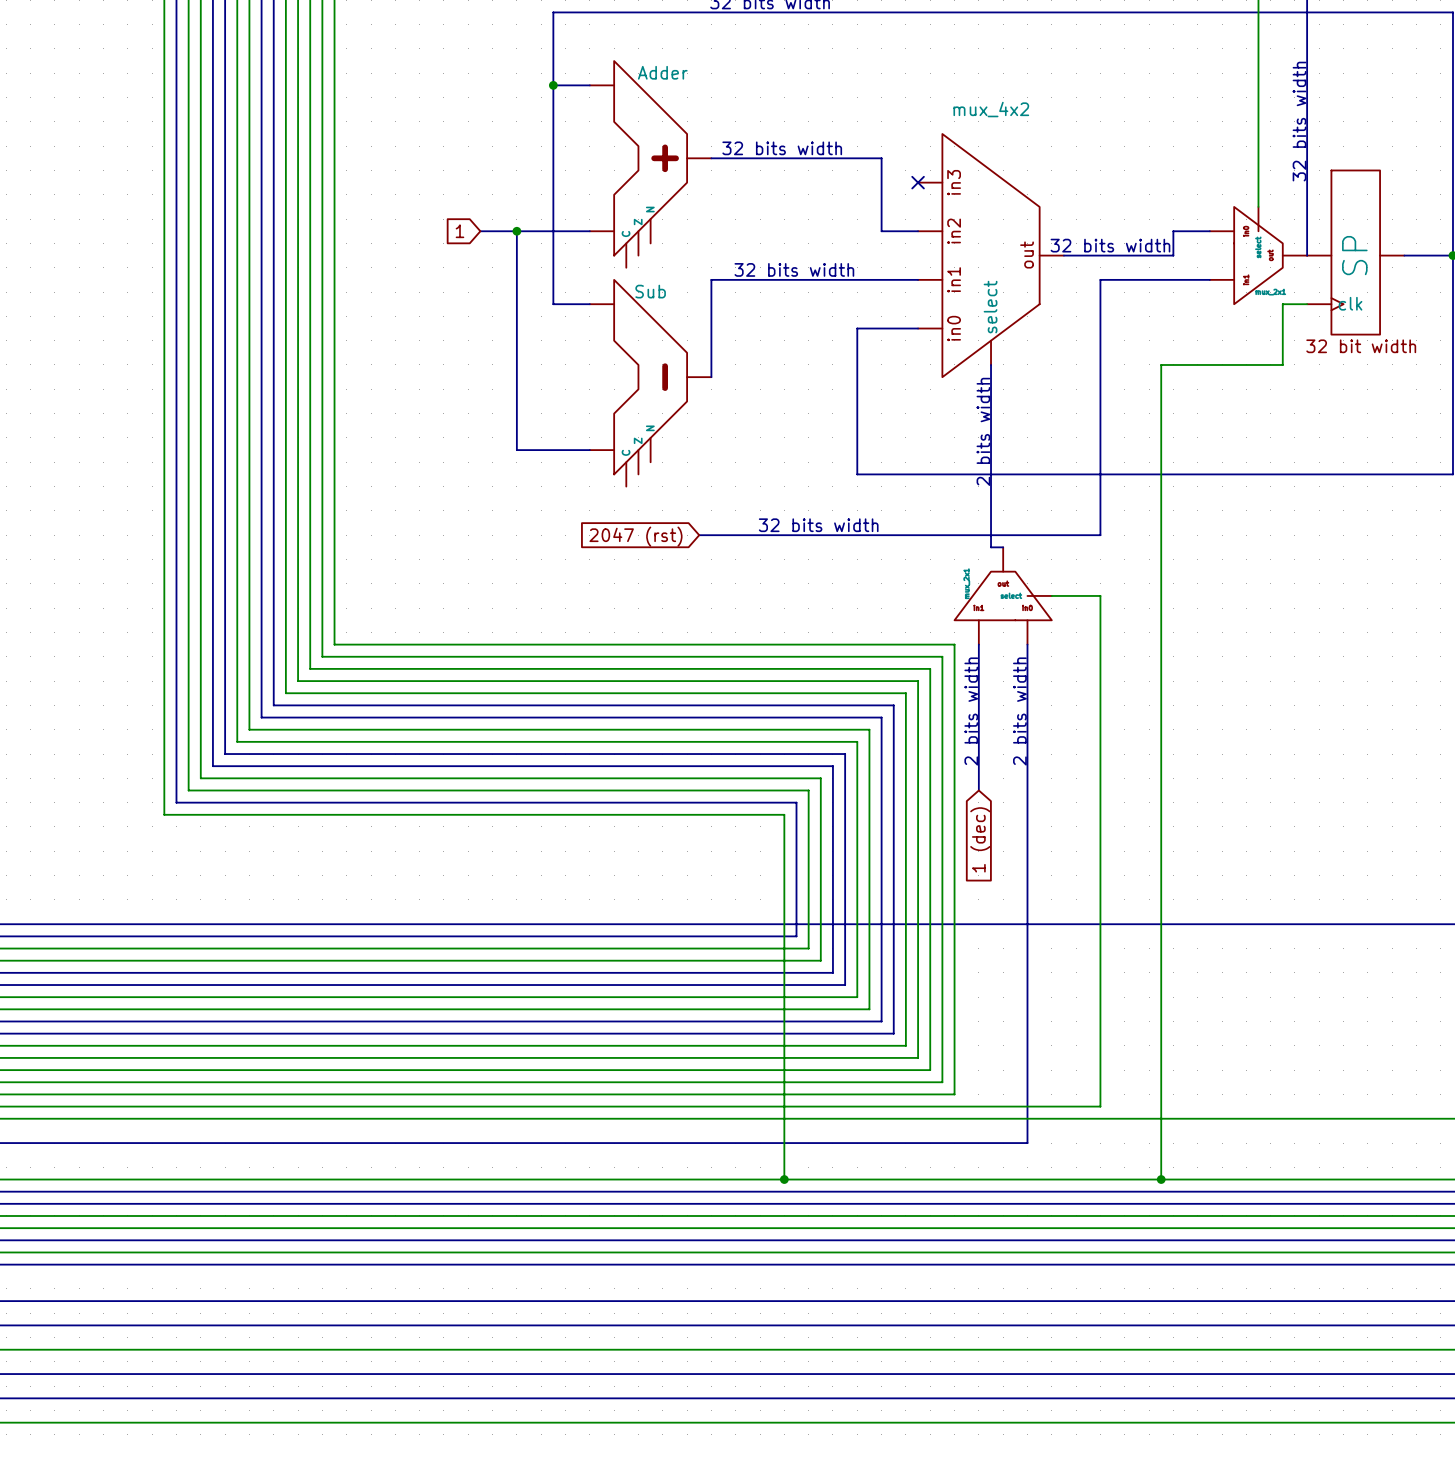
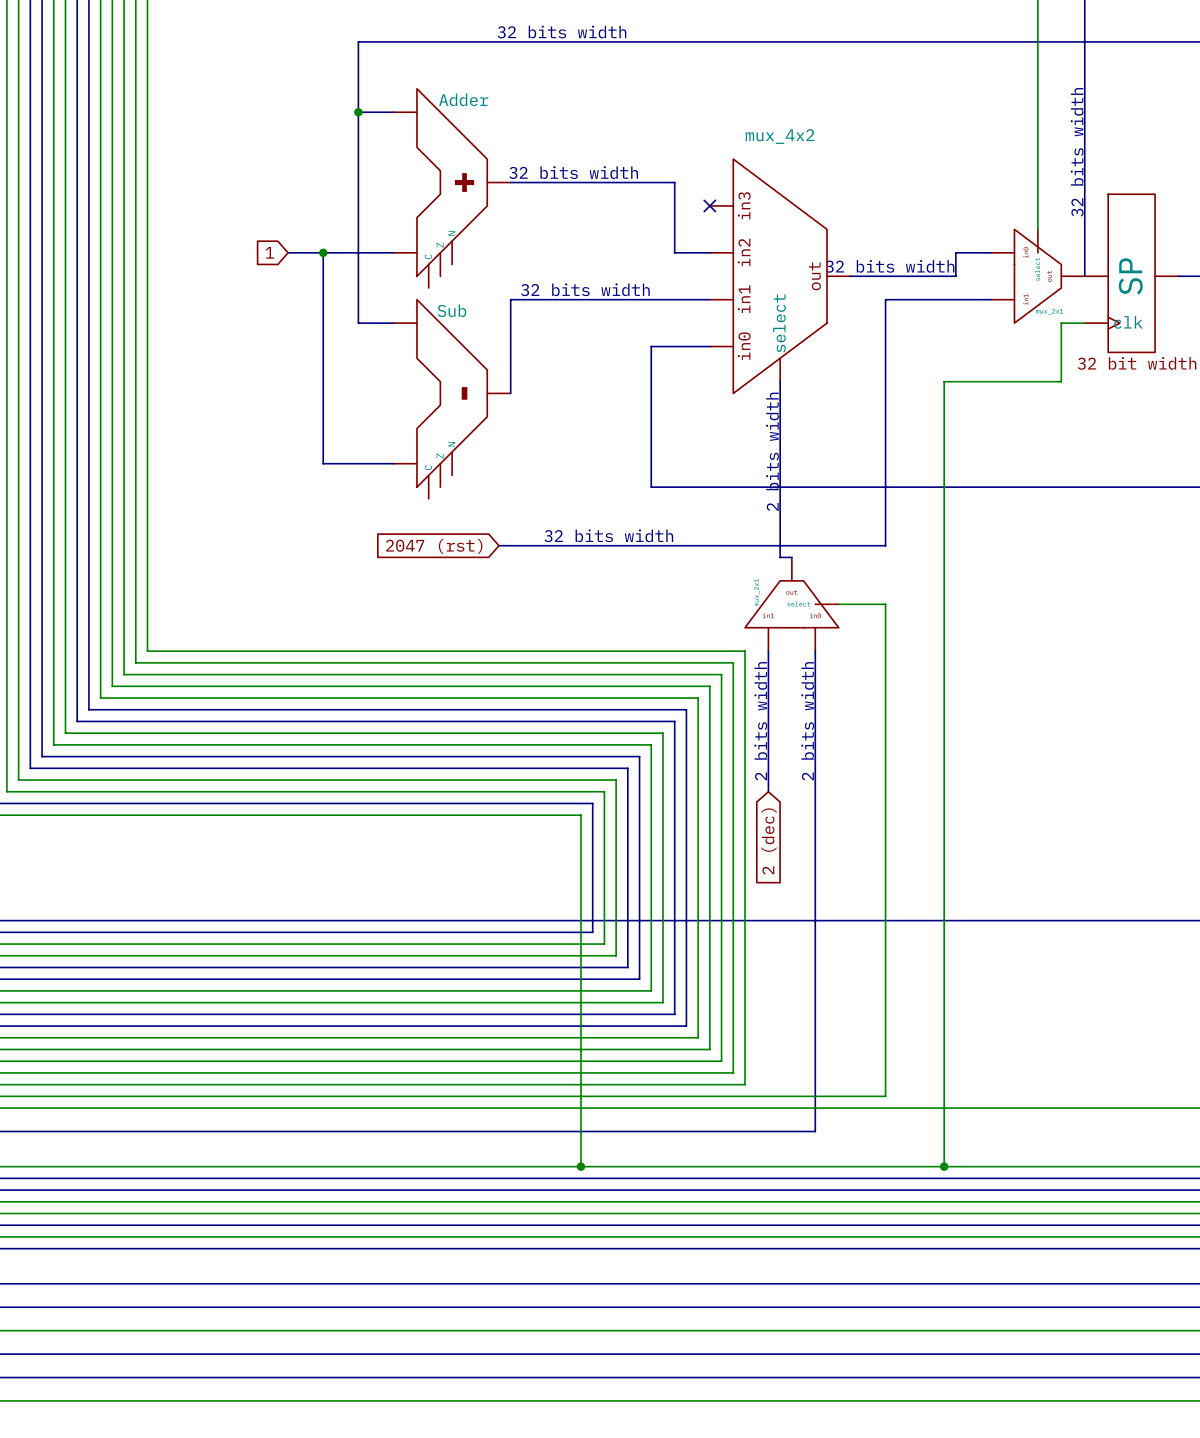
global label: 1 (dec) (980, 839) -> 2 (dec) (769, 841)

